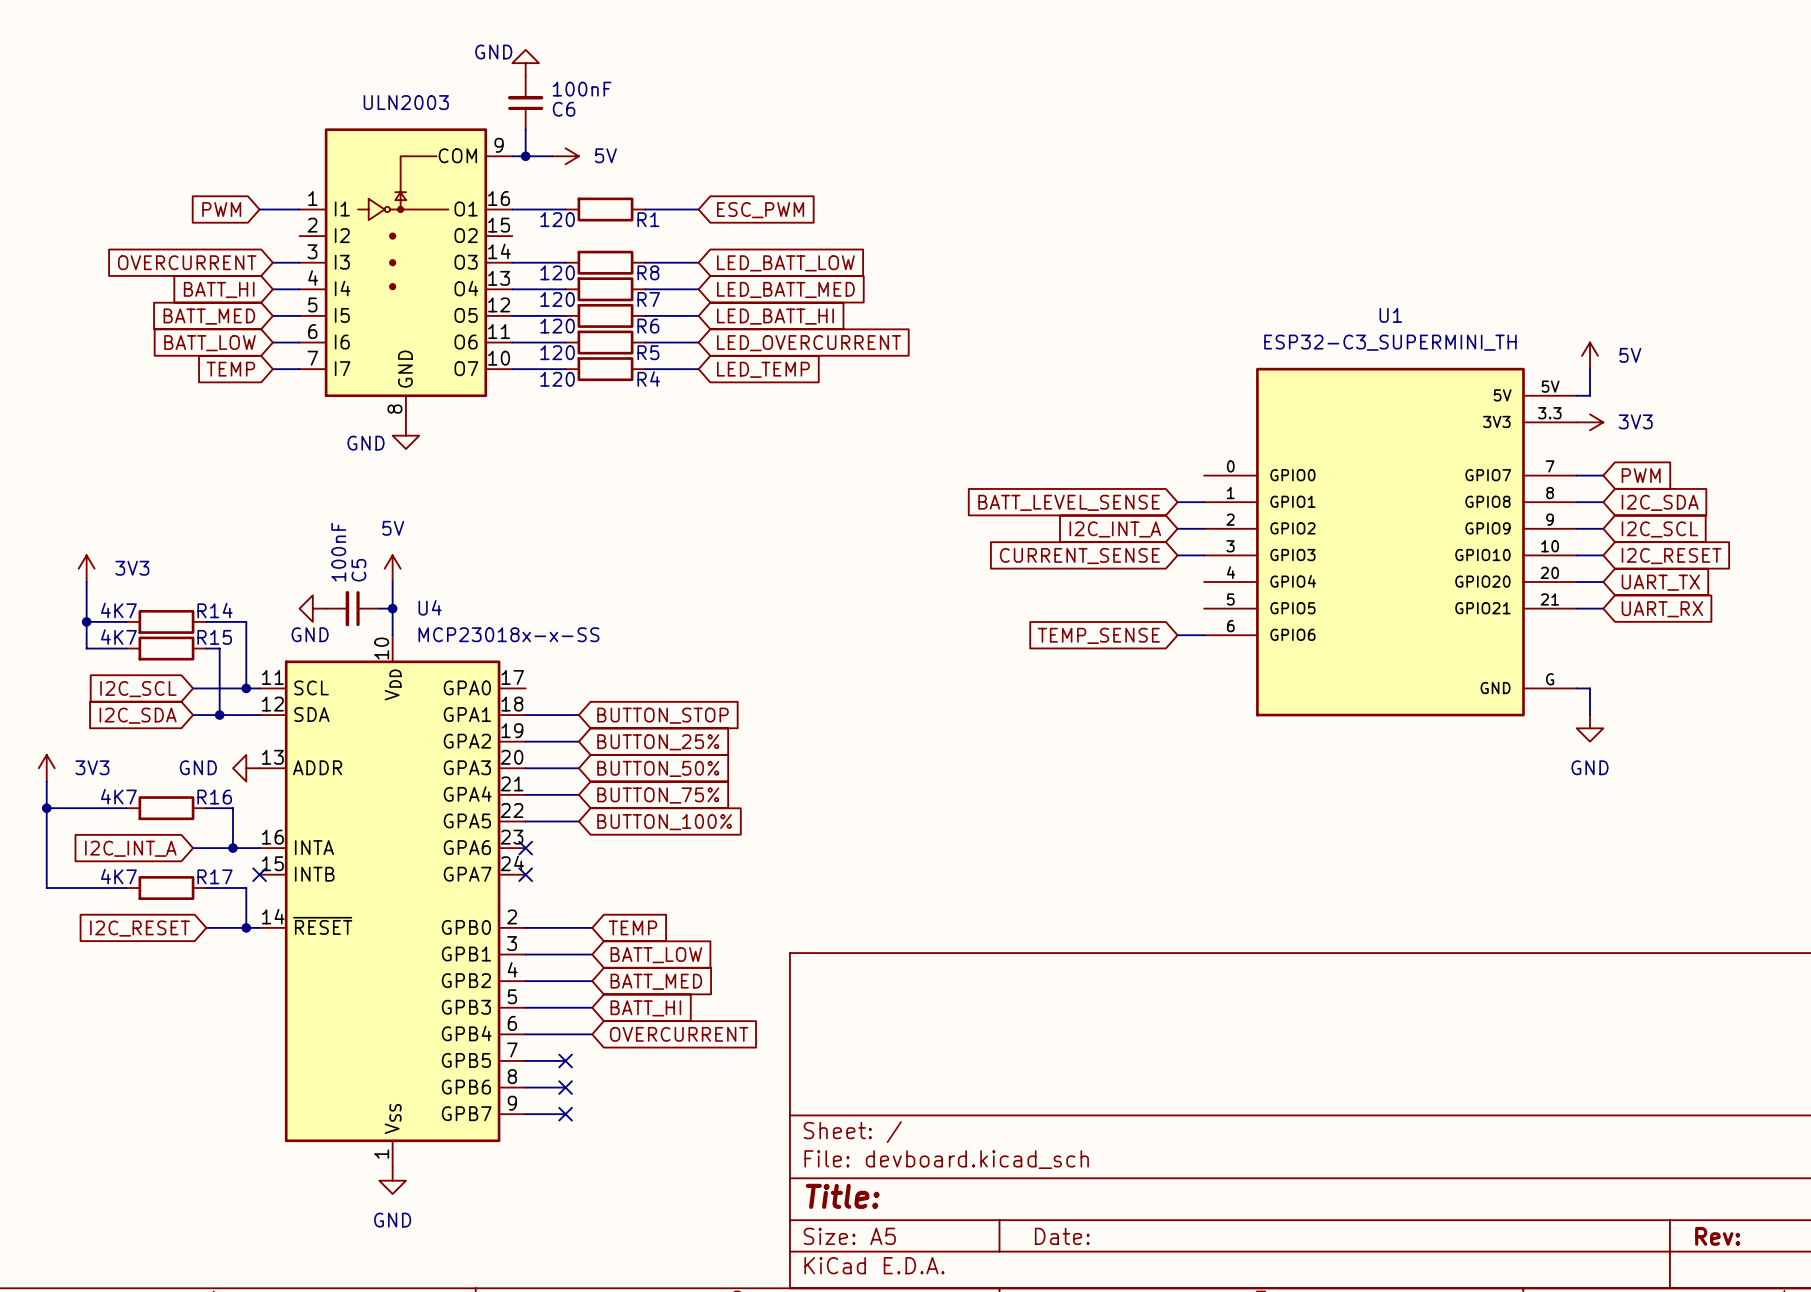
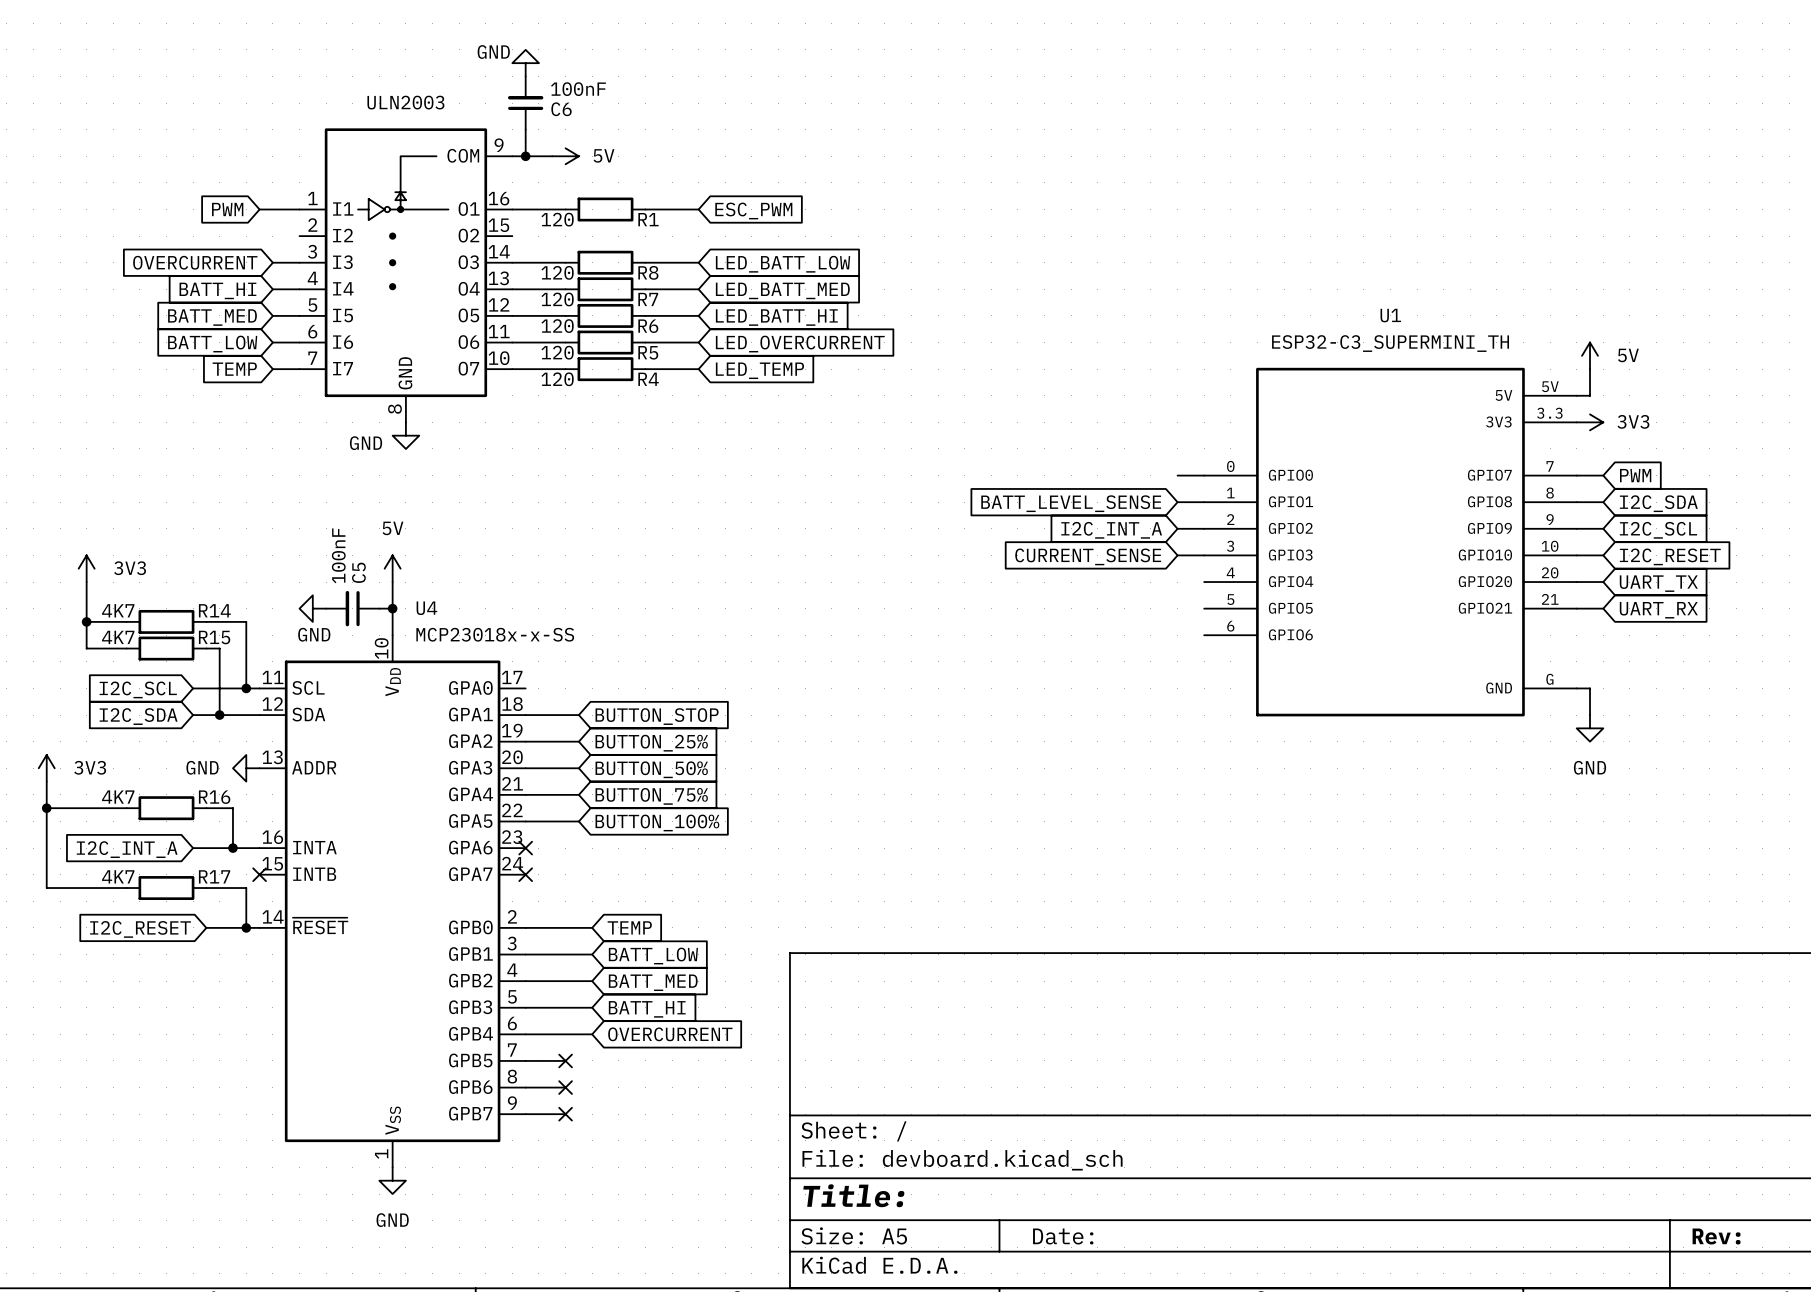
global label: TEMP_SENSE (1098, 635) -> none
wire: (1177, 635) (1204, 635) -> (1177, 475) (1204, 475)

